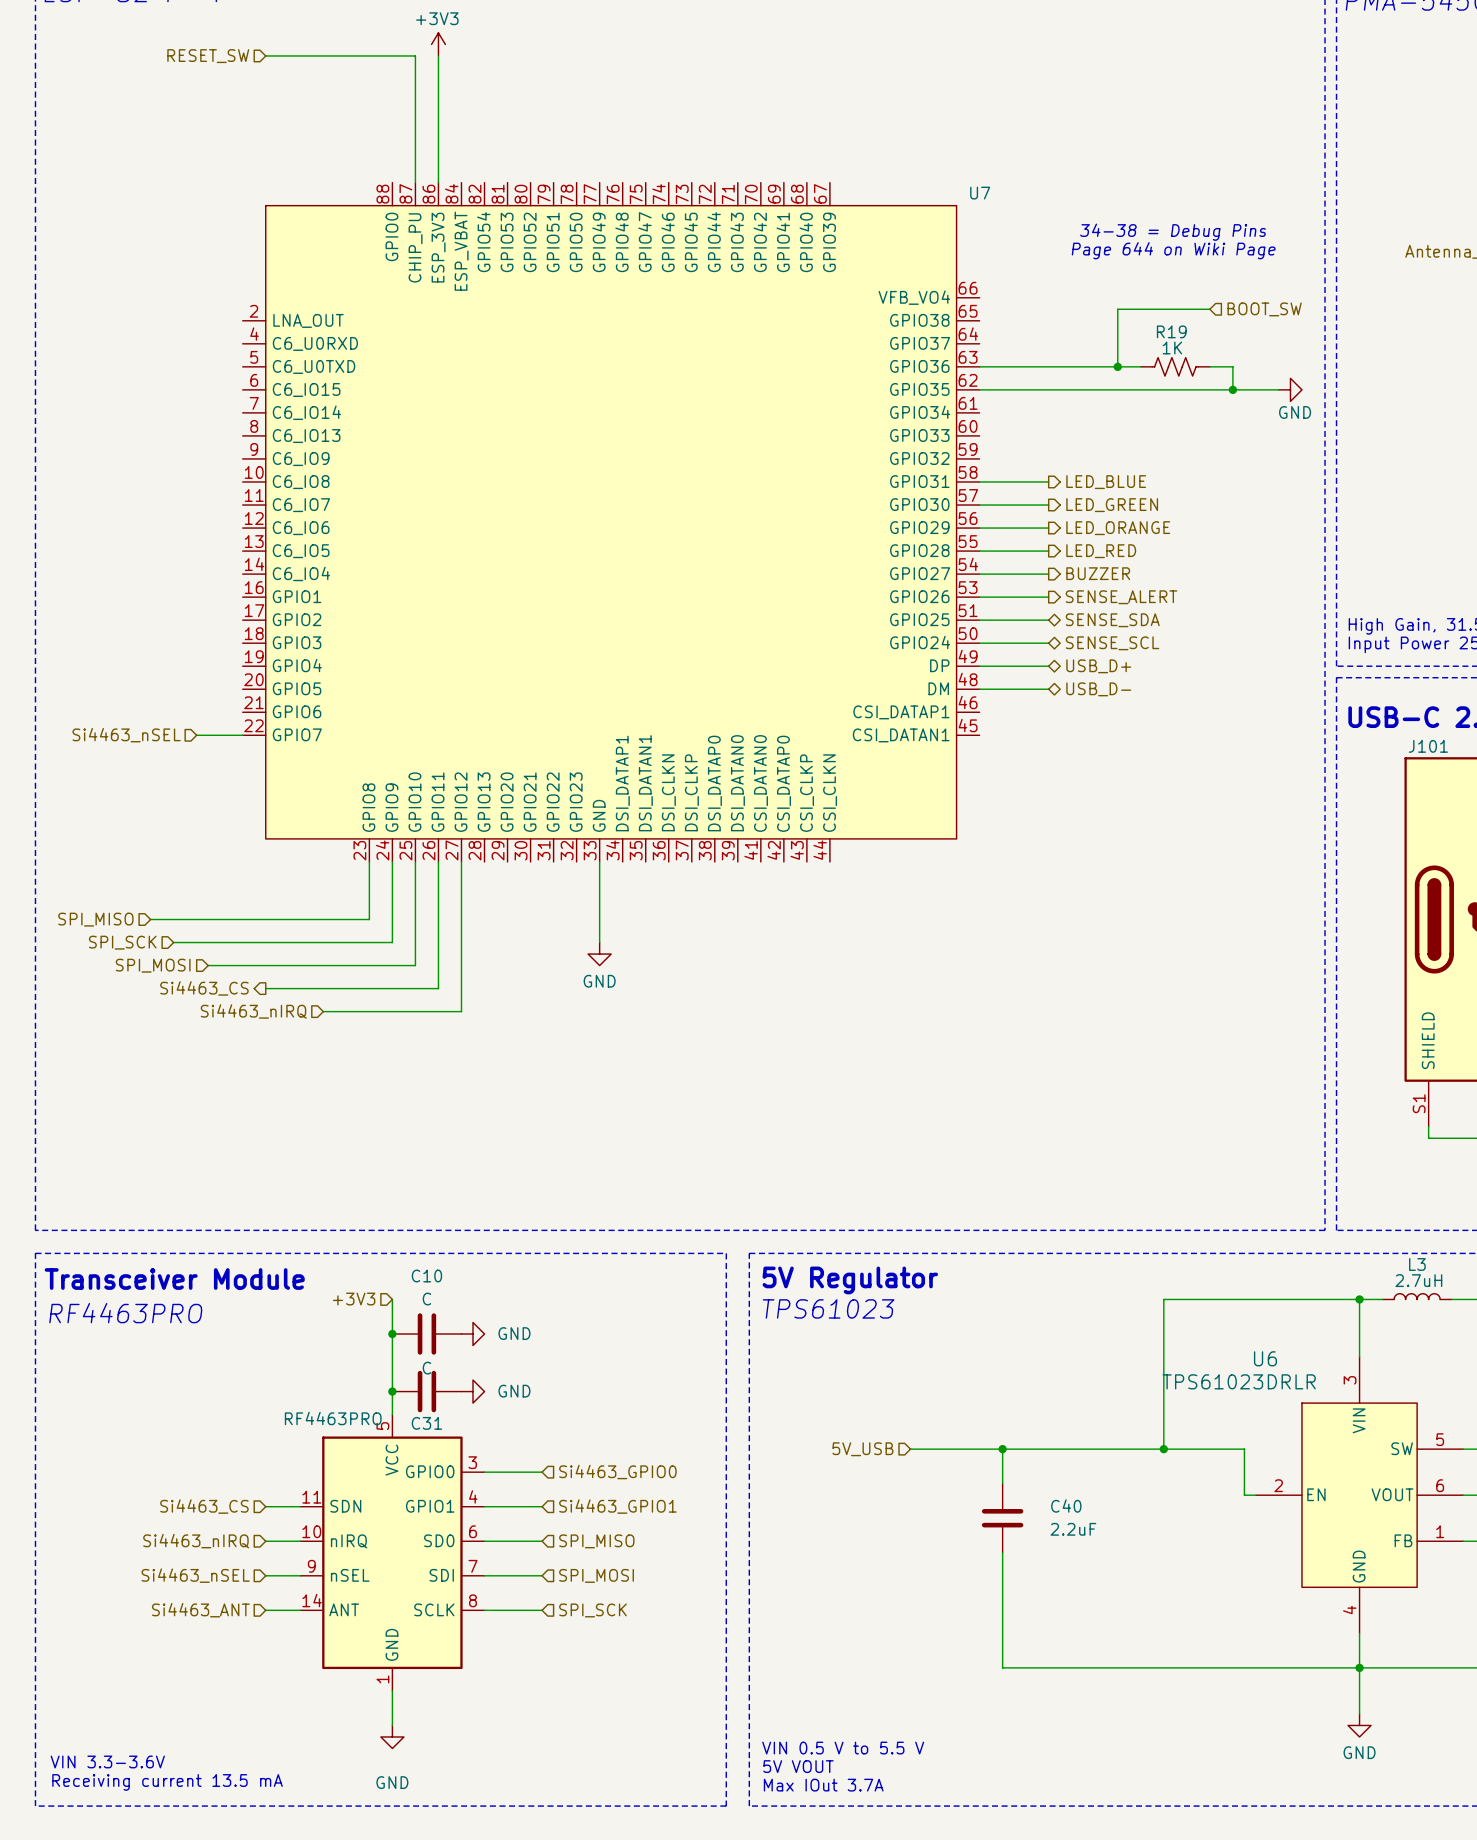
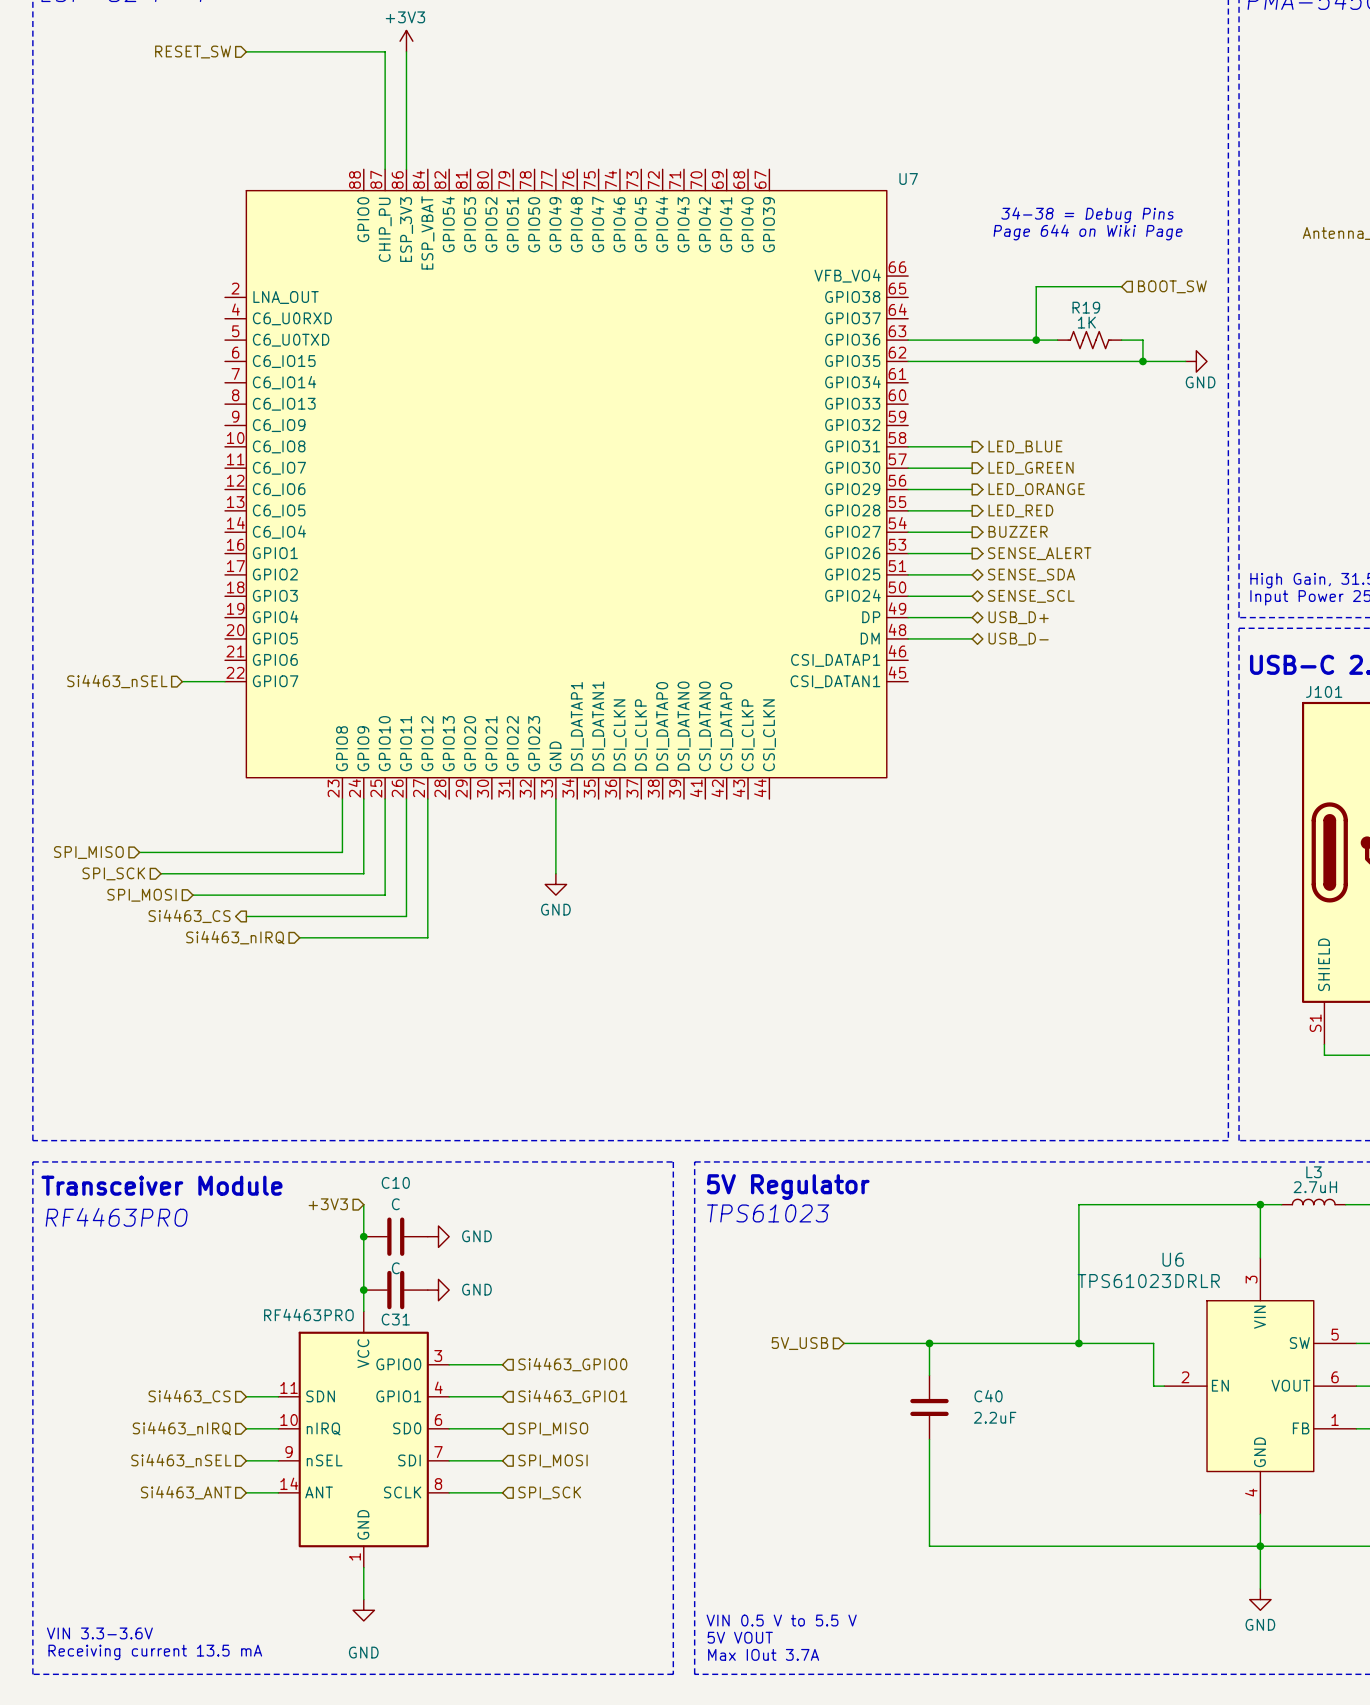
part pin number: 5 (382, 1426) -> none

